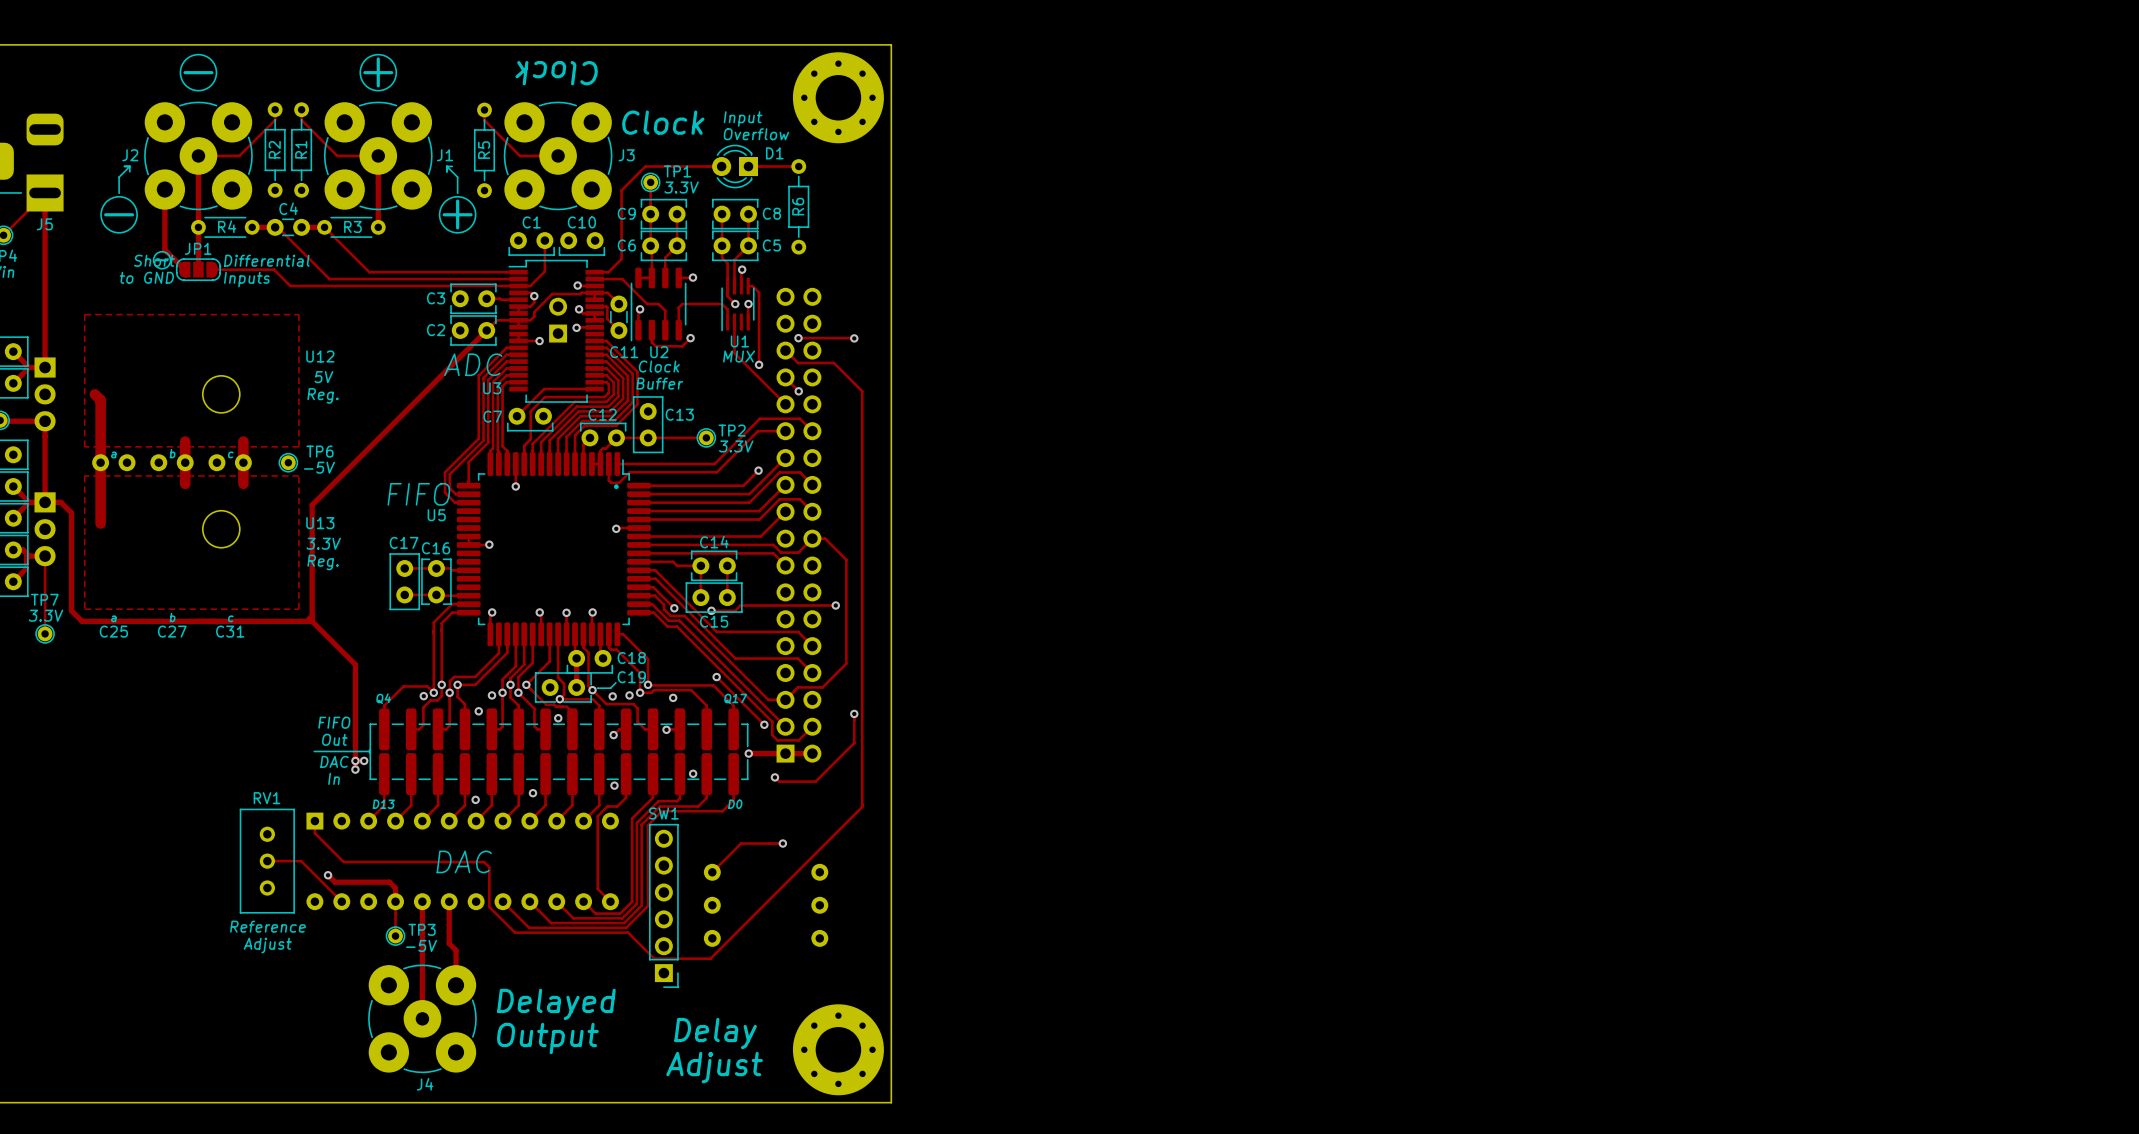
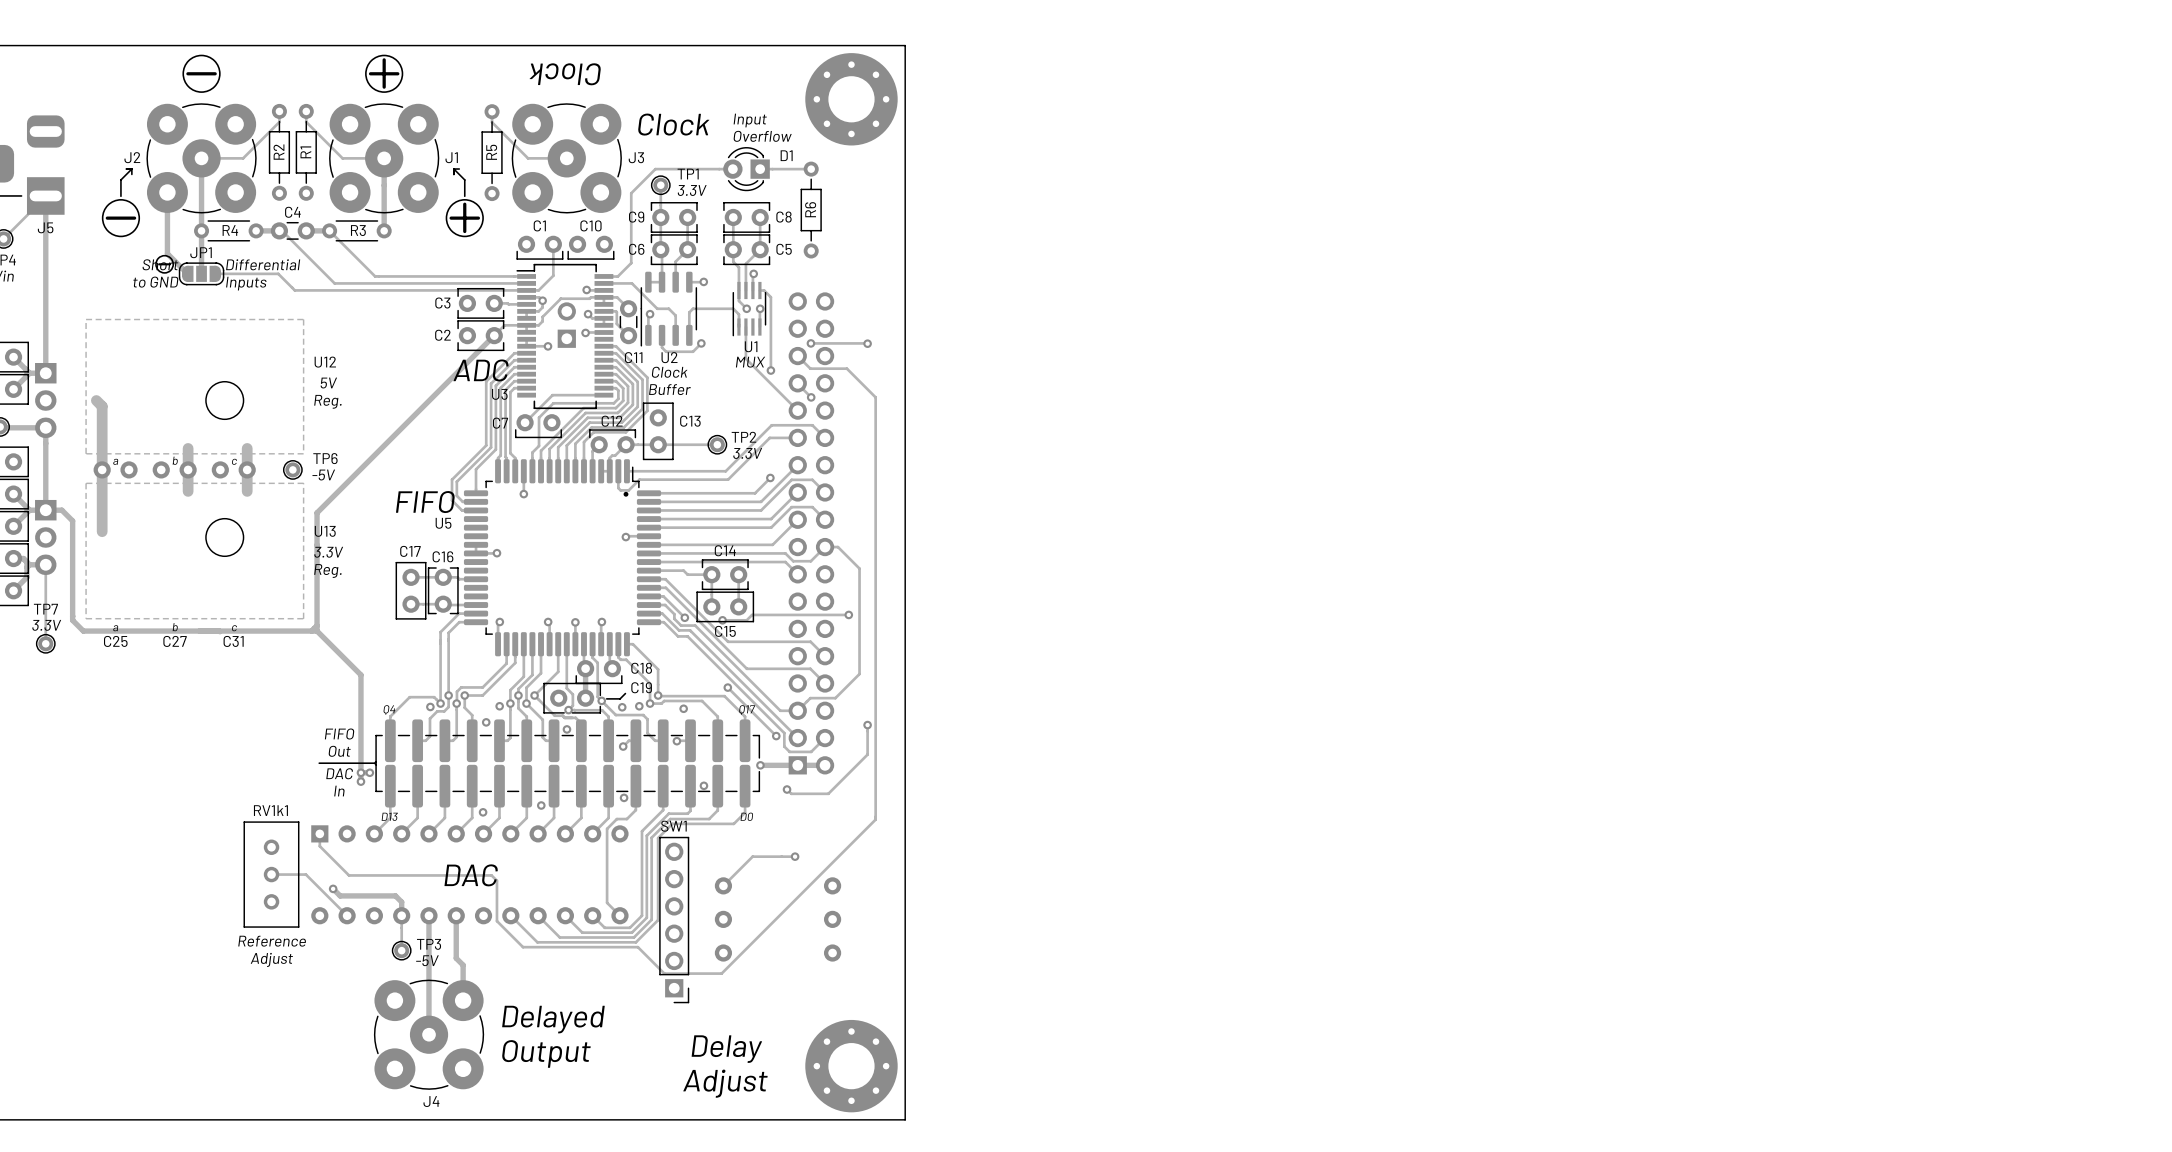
RV1 name: RV1 (267, 798) -> RV1k1 (270, 810)

